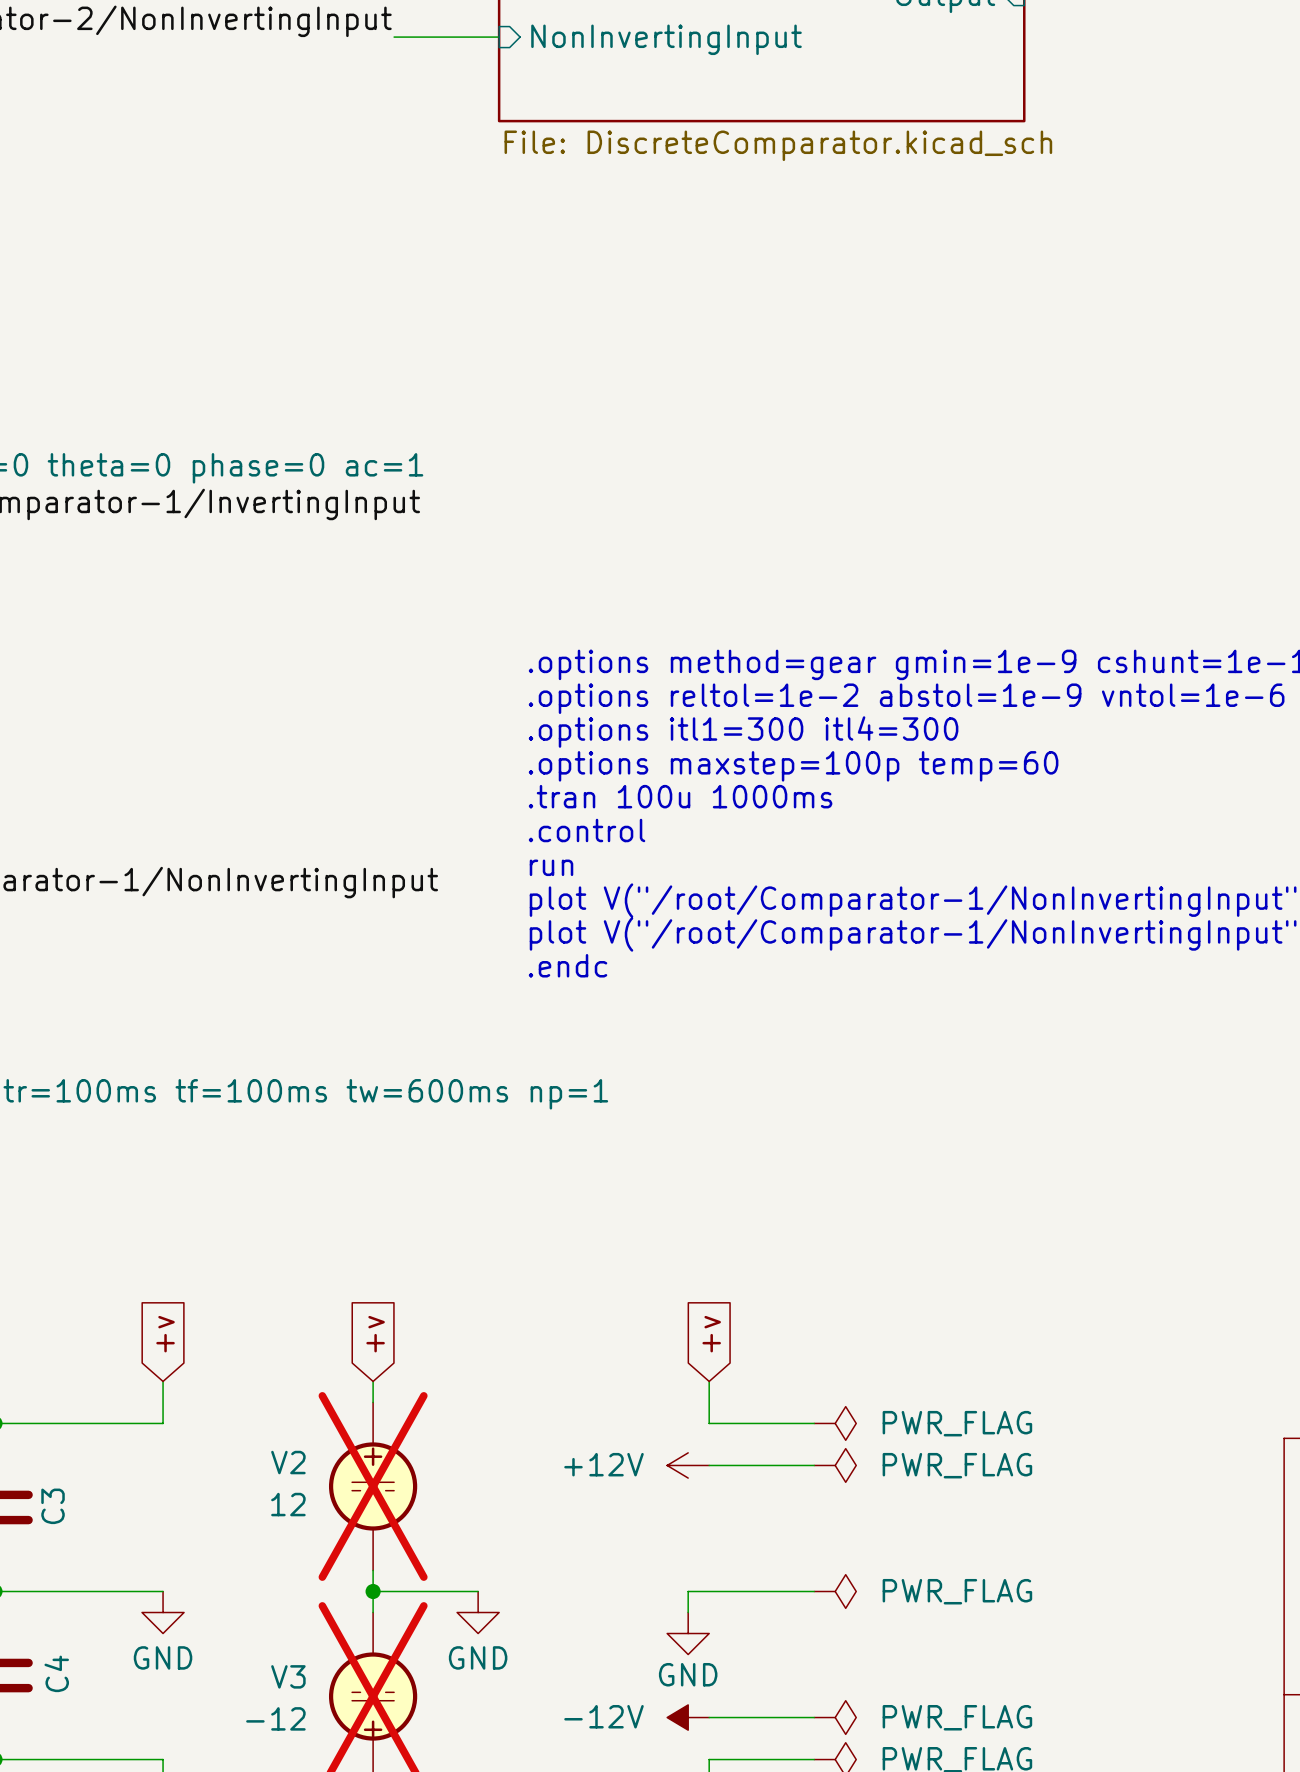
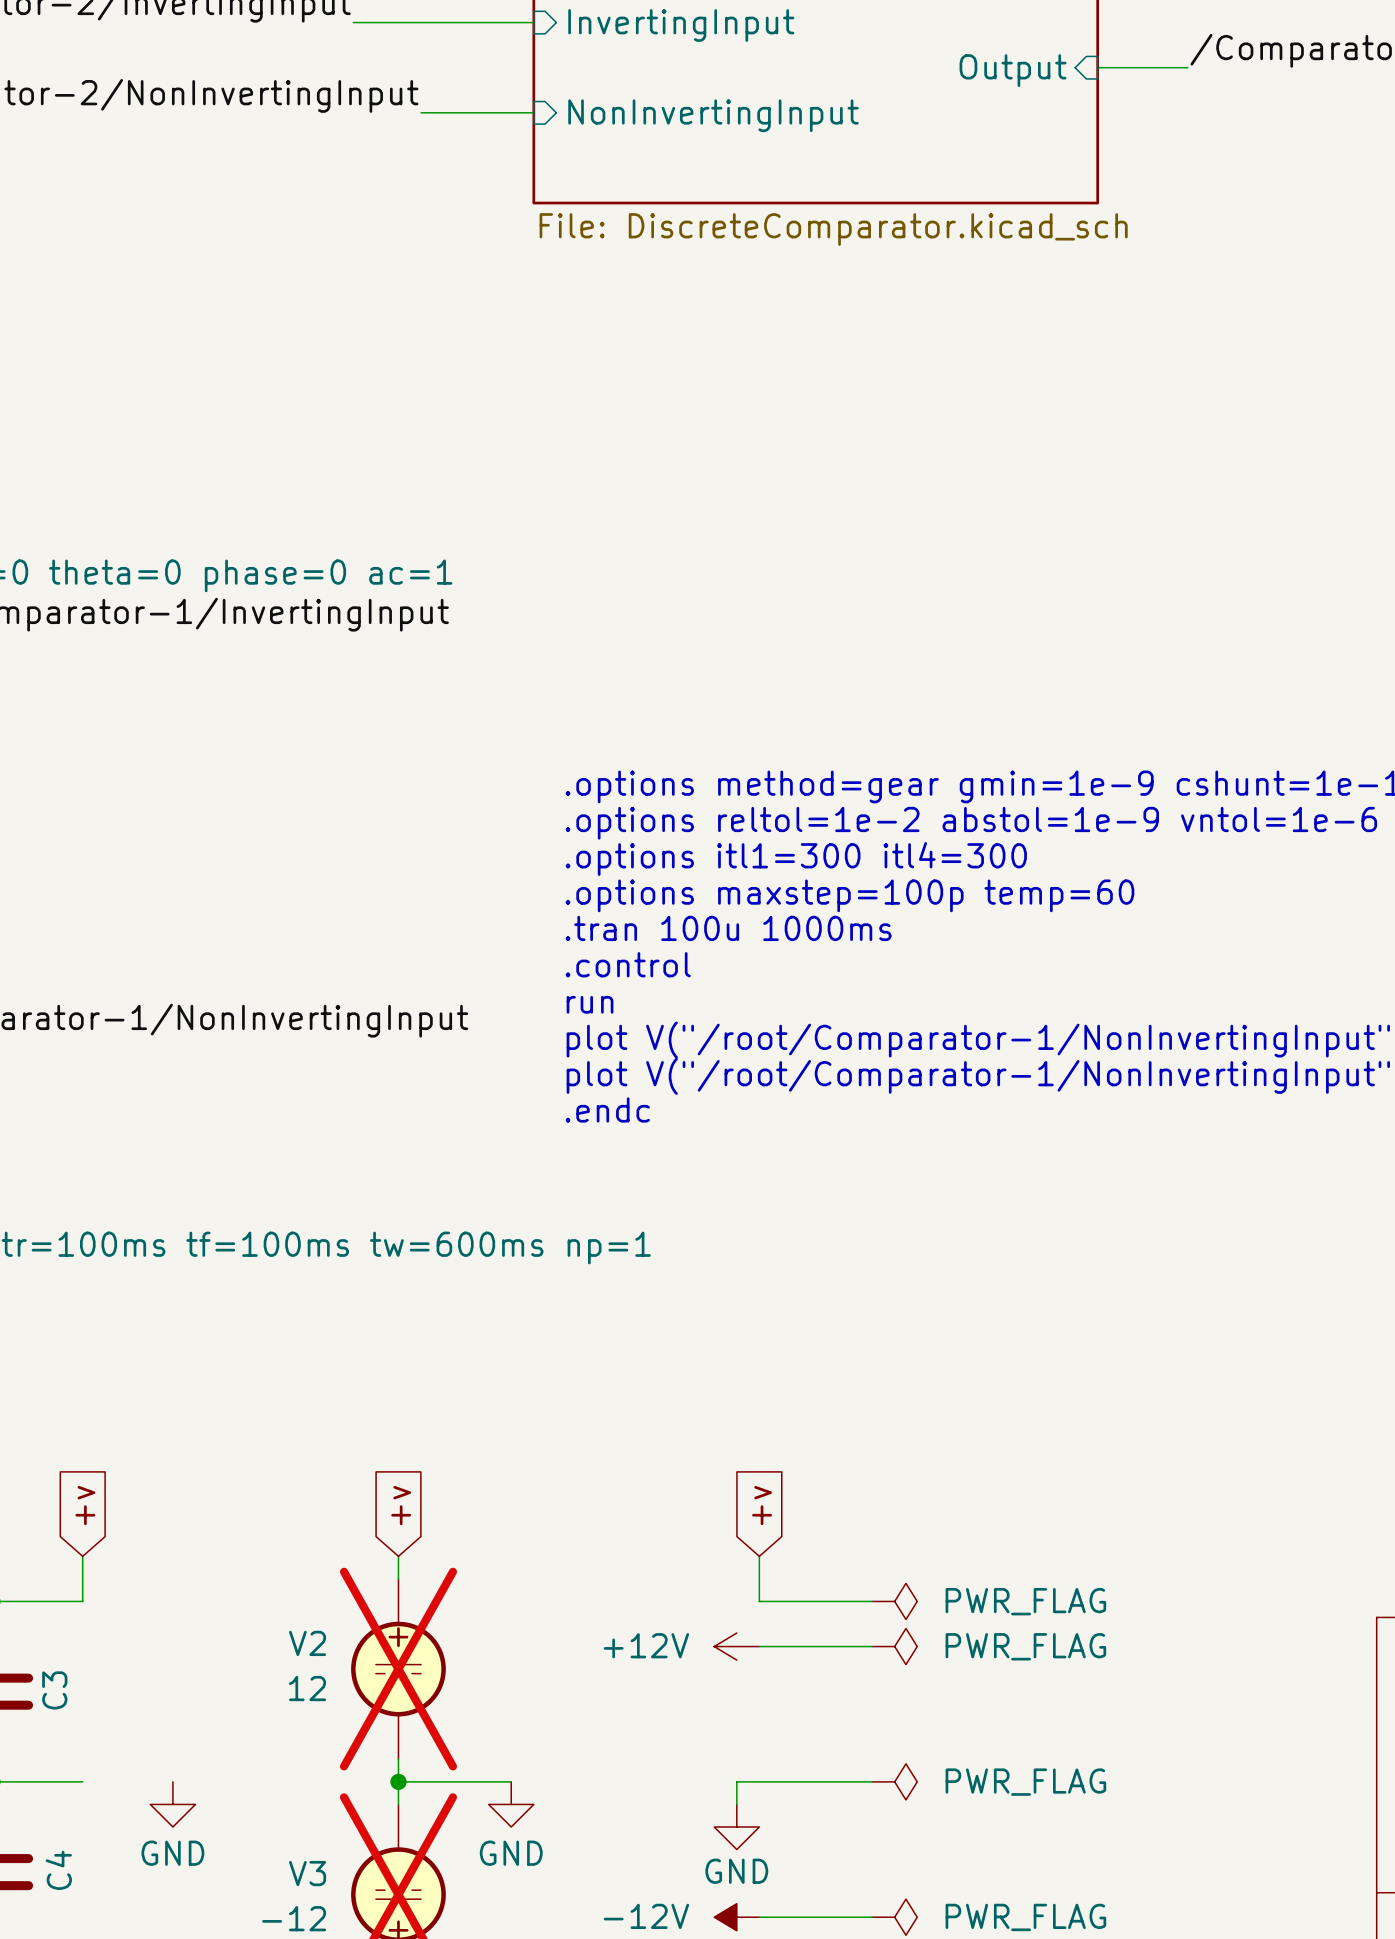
global label position: +v (165, 1334) -> +v (85, 1505)
wire: (163, 1381) (163, 1423) (79, 1423) -> (82, 1556) (82, 1601)
wire: (79, 1591) (163, 1591) -> none

